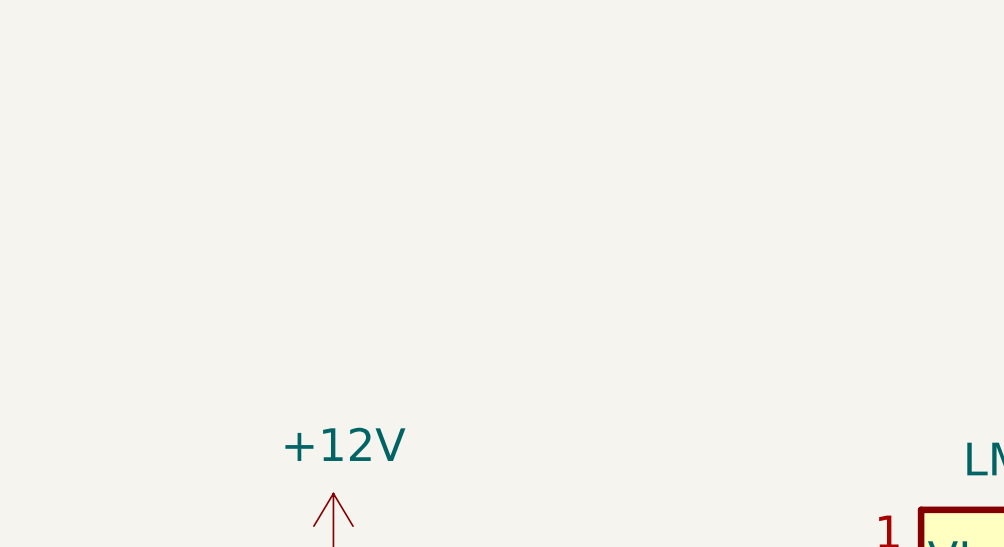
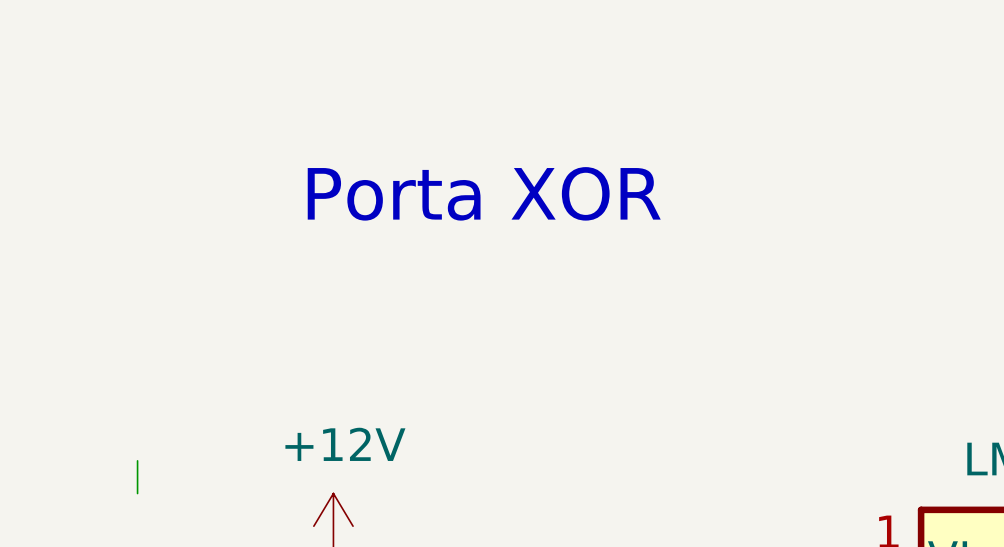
text: none -> Porta XOR (484, 193)
wire: none -> (137, 460) (137, 493)

